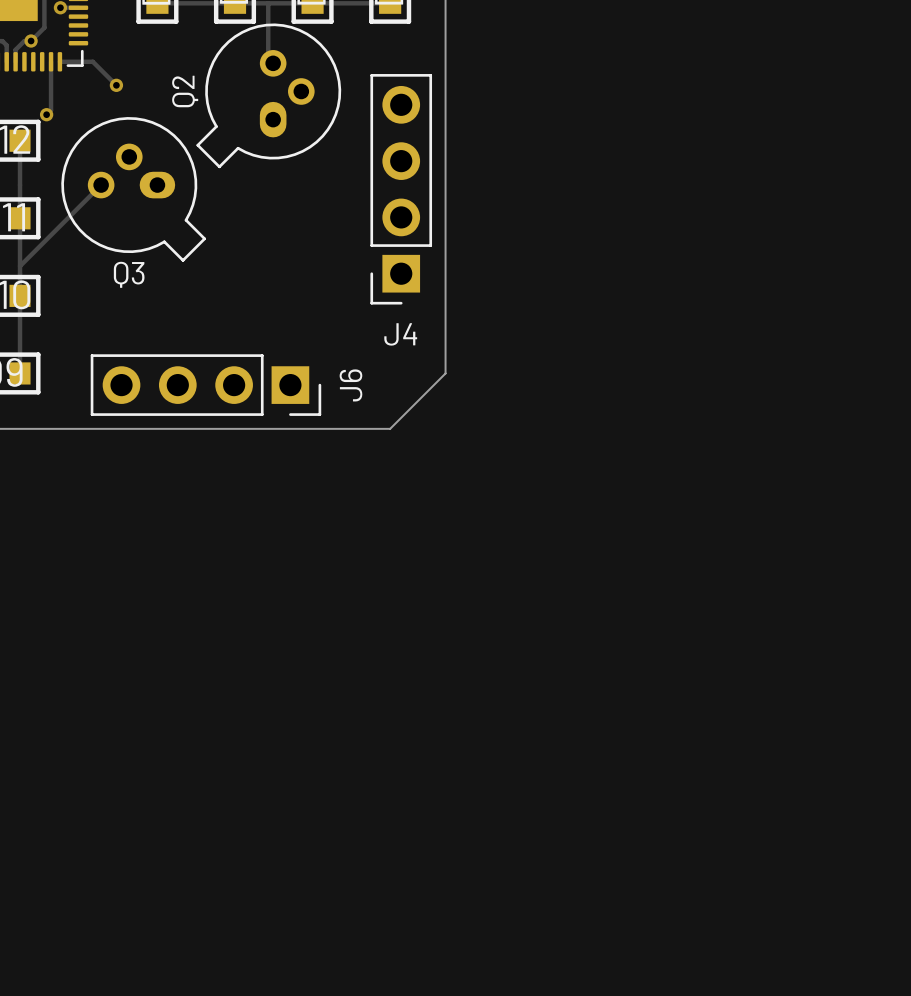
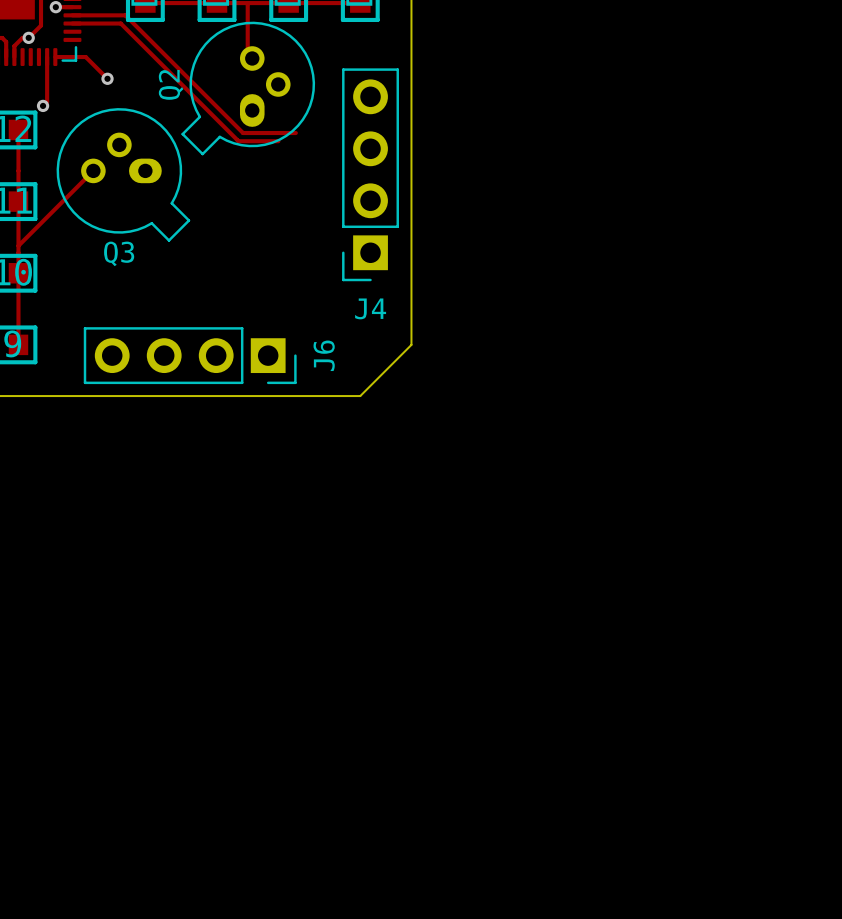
track: none -> (72, 15) (125, 15) (243, 133) (295, 133)
track: none -> (72, 23) (120, 23) (238, 141) (278, 141)

